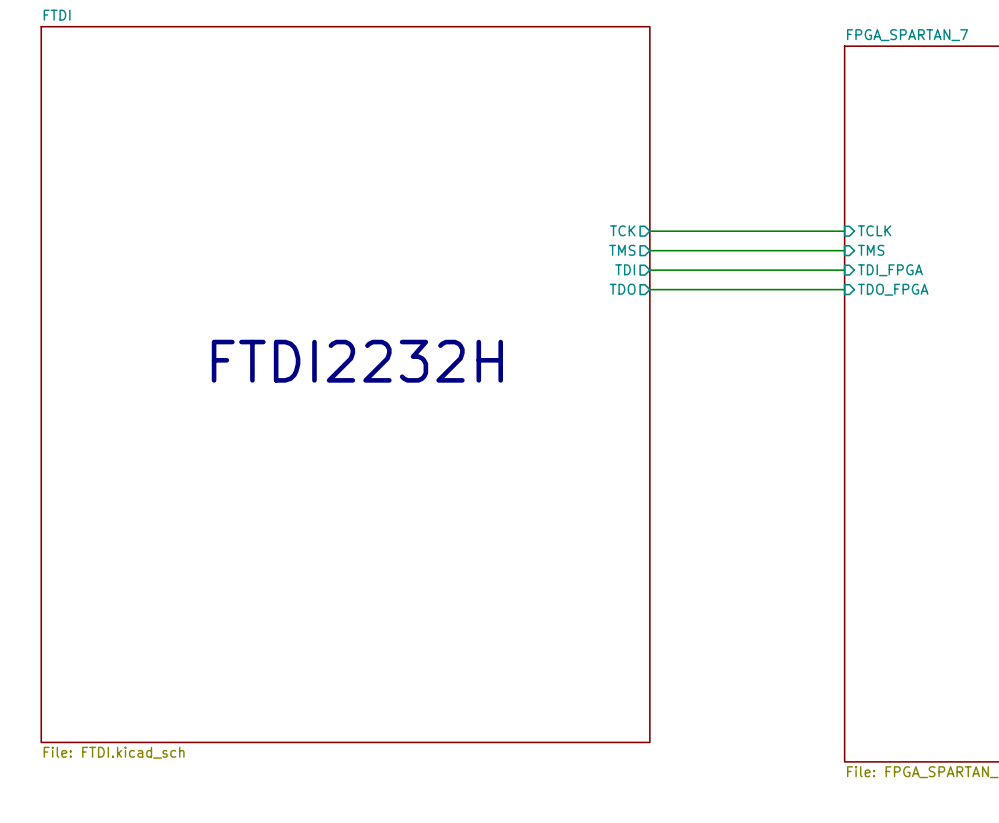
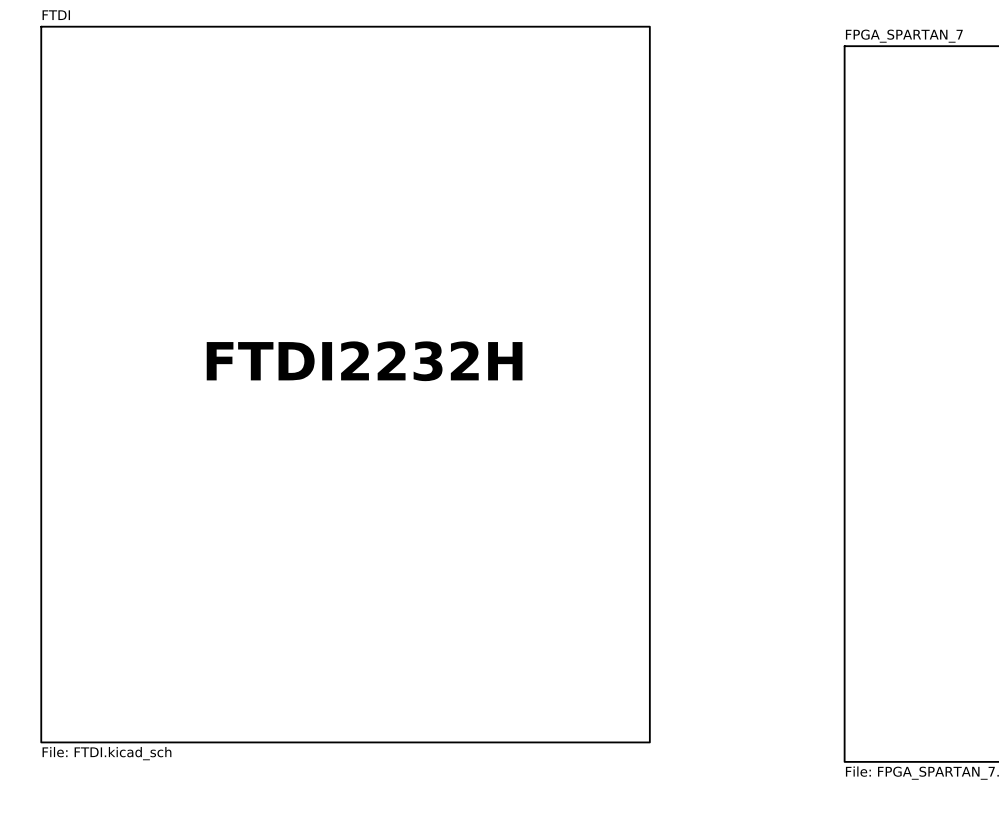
sheet pin: TCK (622, 230) -> none
sheet pin: TCLK (874, 230) -> none
wire: (649, 231) (844, 231) -> none
sheet pin: TMS (622, 250) -> none
wire: (649, 250) (844, 250) -> none
sheet pin: TMS (871, 250) -> none
sheet pin: TDI (625, 269) -> none
wire: (649, 270) (844, 270) -> none
sheet pin: TDI_FPGA (890, 270) -> none
sheet pin: TDO (622, 289) -> none
wire: (649, 289) (844, 289) -> none
sheet pin: TDO_FPGA (893, 289) -> none

